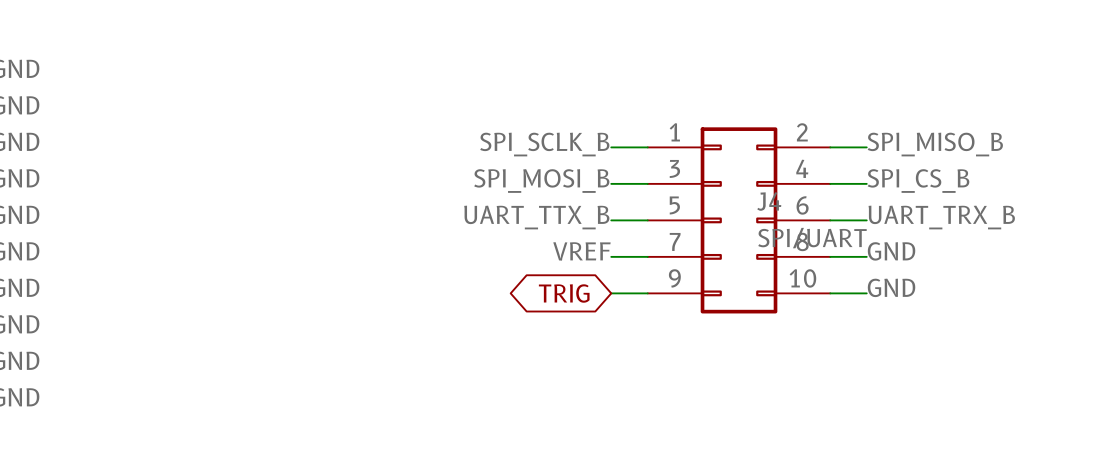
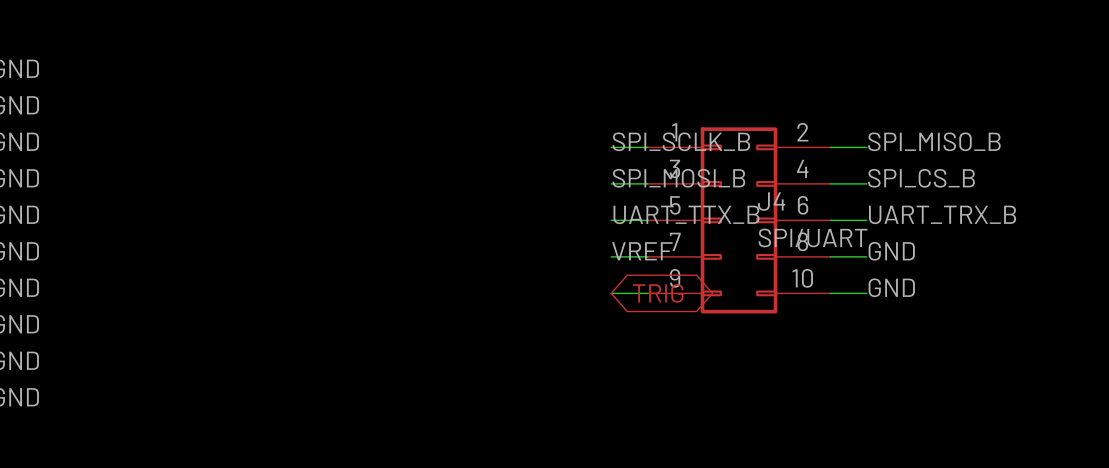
label position: SPI_SCLK_B (544, 144) -> SPI_SCLK_B (681, 141)
label position: SPI_MOSI_B (541, 181) -> SPI_MOSI_B (678, 178)
label position: UART_TTX_B (536, 217) -> UART_TTX_B (686, 214)
label position: VREF (581, 251) -> VREF (642, 251)
global label rotation: 0° (564, 293) -> 180° (658, 293)

